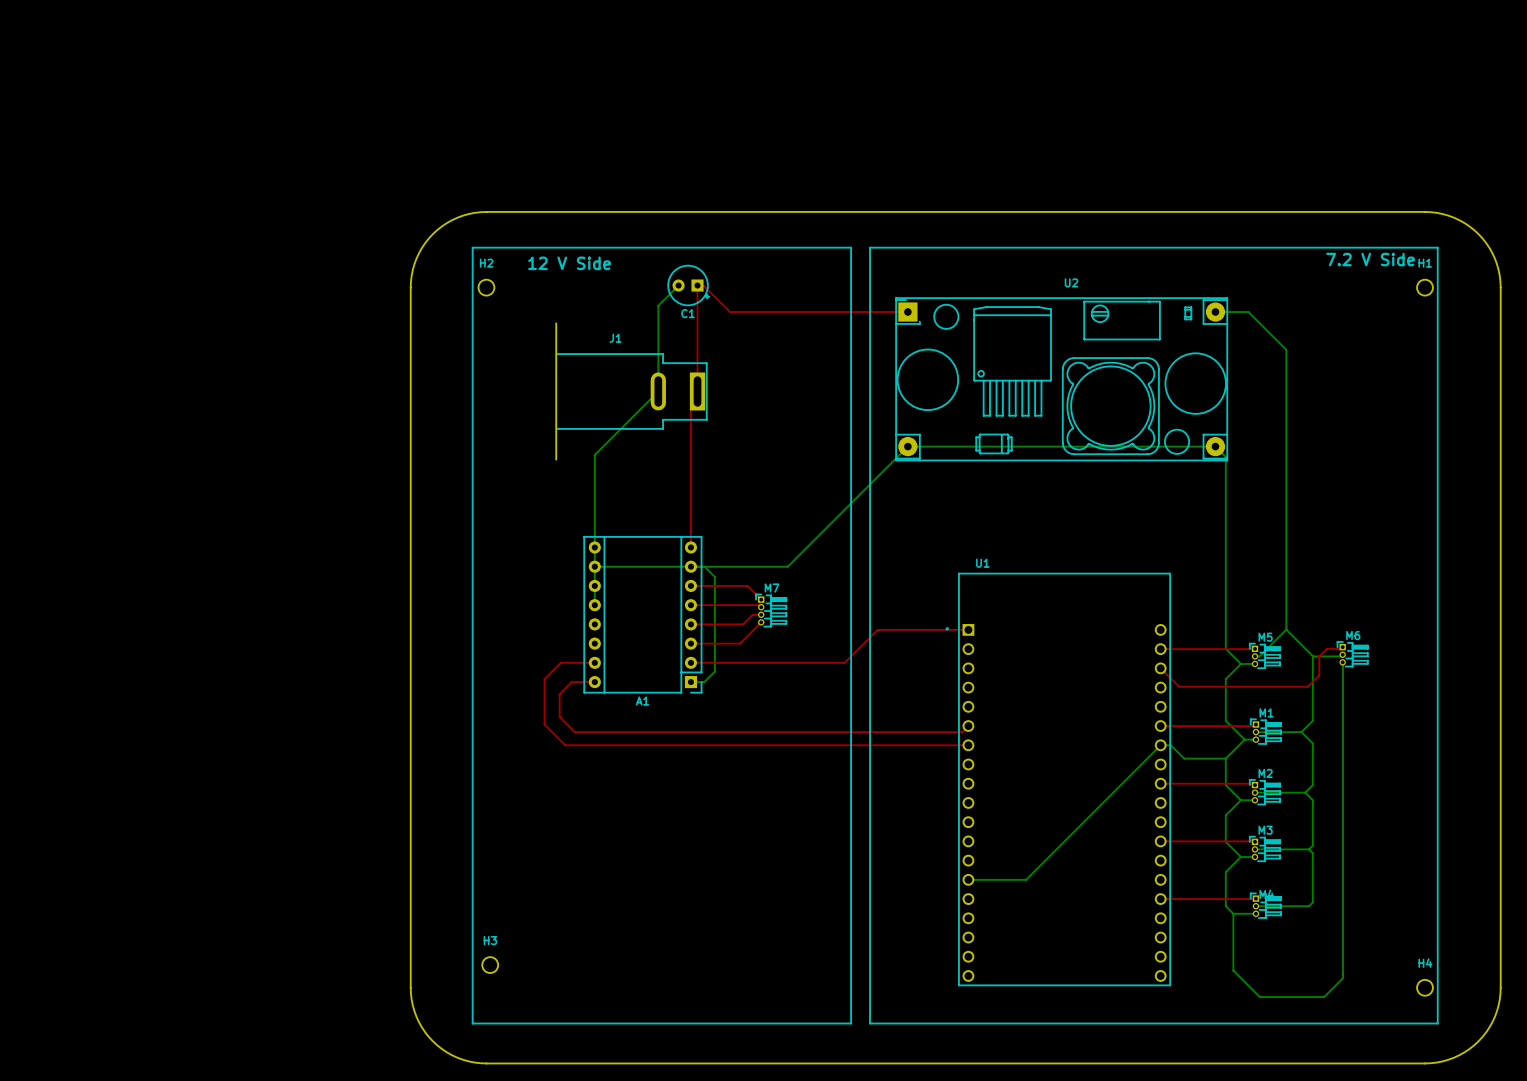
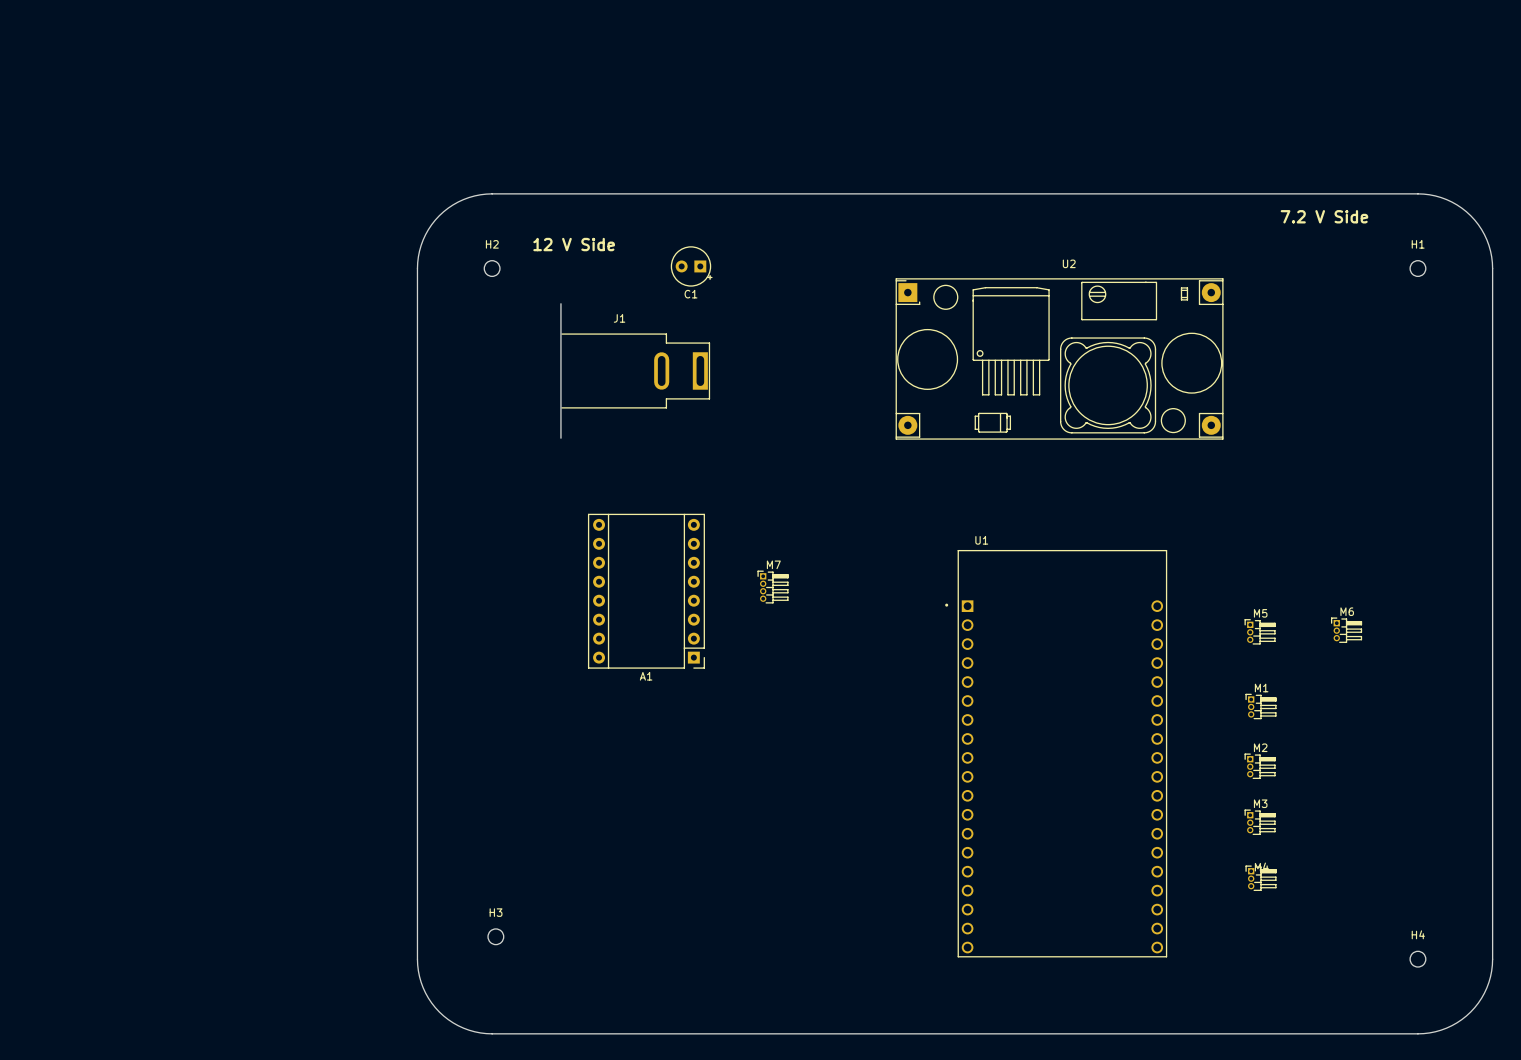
line: (472, 247) (851, 247) (851, 1023) (472, 1023) (472, 247) -> none
line: (870, 247) (1437, 247) (1437, 1023) (870, 1023) (870, 247) -> none
text position: 7.2 V Side (1370, 259) -> 7.2 V Side (1324, 216)
bottom track: (678, 285) (658, 305) (658, 391) (594, 454) (594, 605) -> none
top track: (907, 312) (730, 312) (703, 285) (697, 285) (697, 391) (690, 398) (690, 547) -> none
bottom track: (1215, 312) (1248, 312) (1286, 349) (1286, 629) -> none
bottom track: (594, 566) (787, 566) (907, 446) (1215, 446) (1225, 456) (1225, 648) (1240, 663) -> none
bottom track: (704, 566) (714, 576) (714, 671) (704, 682) (690, 682) -> none
top track: (690, 585) (747, 585) (761, 599) -> none
top track: (690, 605) (759, 605) (761, 607) -> none
top track: (761, 614) (752, 614) (743, 624) (690, 624) -> none
top track: (761, 622) (739, 643) (690, 643) -> none
top track: (968, 629) (877, 629) (844, 662) (690, 662) -> none
bottom track: (1286, 629) (1259, 656) (1255, 656) -> none
bottom track: (1286, 629) (1313, 656) -> none
top track: (1255, 648) (1160, 649) -> none
top track: (1342, 648) (1326, 648) (1319, 656) (1319, 675) (1307, 686) (1179, 686) (1160, 668) -> none
bottom track: (1342, 654) (1342, 656) (1313, 656) -> none
bottom track: (1313, 656) (1312, 720) (1301, 732) -> none
top track: (594, 662) (560, 662) (544, 679) (544, 724) (565, 745) (968, 745) -> none
bottom track: (1240, 663) (1255, 663) -> none
bottom track: (1240, 663) (1225, 679) (1225, 720) (1244, 739) -> none
bottom track: (1342, 663) (1343, 978) (1324, 997) (1259, 997) (1233, 970) (1233, 913) -> none
top track: (594, 682) (571, 682) (559, 694) (559, 716) (574, 732) (962, 732) (968, 726) -> none
top track: (1255, 724) (1160, 726) -> none
bottom track: (1255, 732) (1301, 732) -> none
bottom track: (1301, 732) (1312, 743) (1312, 785) (1305, 792) -> none
bottom track: (1244, 739) (1255, 739) -> none
bottom track: (1244, 739) (1225, 758) -> none
bottom track: (1225, 758) (1225, 785) (1240, 800) -> none
bottom track: (1225, 758) (1184, 758) (1170, 745) (1160, 745) (1026, 879) (968, 879) -> none
top track: (1160, 783) (1255, 785) -> none
bottom track: (1255, 792) (1305, 792) -> none
bottom track: (1305, 792) (1312, 800) (1312, 845) (1309, 849) -> none
bottom track: (1240, 800) (1255, 800) -> none
bottom track: (1240, 800) (1225, 815) (1225, 841) (1240, 856) -> none
top track: (1160, 841) (1255, 841) -> none
bottom track: (1255, 849) (1309, 849) -> none
bottom track: (1309, 849) (1312, 853) (1312, 902) (1309, 906) (1255, 906) -> none
bottom track: (1240, 856) (1225, 872) (1225, 906) (1233, 913) -> none
bottom track: (1240, 856) (1255, 856) -> none
top track: (1255, 898) (1160, 899) -> none
bottom track: (1233, 913) (1255, 913) -> none

